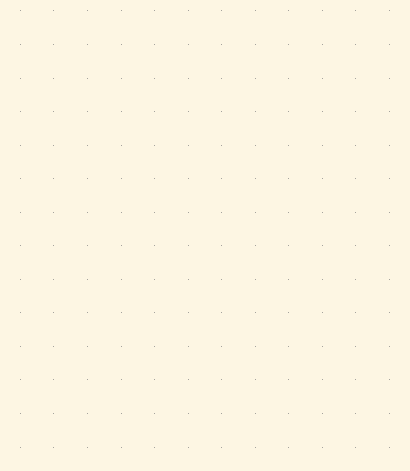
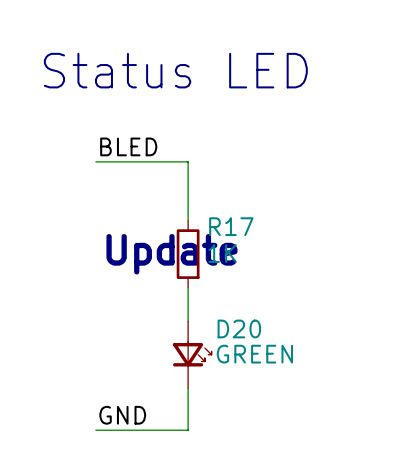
text: none -> Status LED (175, 70)
label: none -> BLED (128, 146)
wire: none -> (95, 161) (188, 161) (188, 220)
text: none -> Update (171, 254)
R17: none -> 1K (188, 254)
wire: none -> (188, 287) (188, 321)
D20: none -> GREEN (192, 354)
wire: none -> (188, 388) (188, 430) (95, 430)
label: none -> GND (122, 415)

